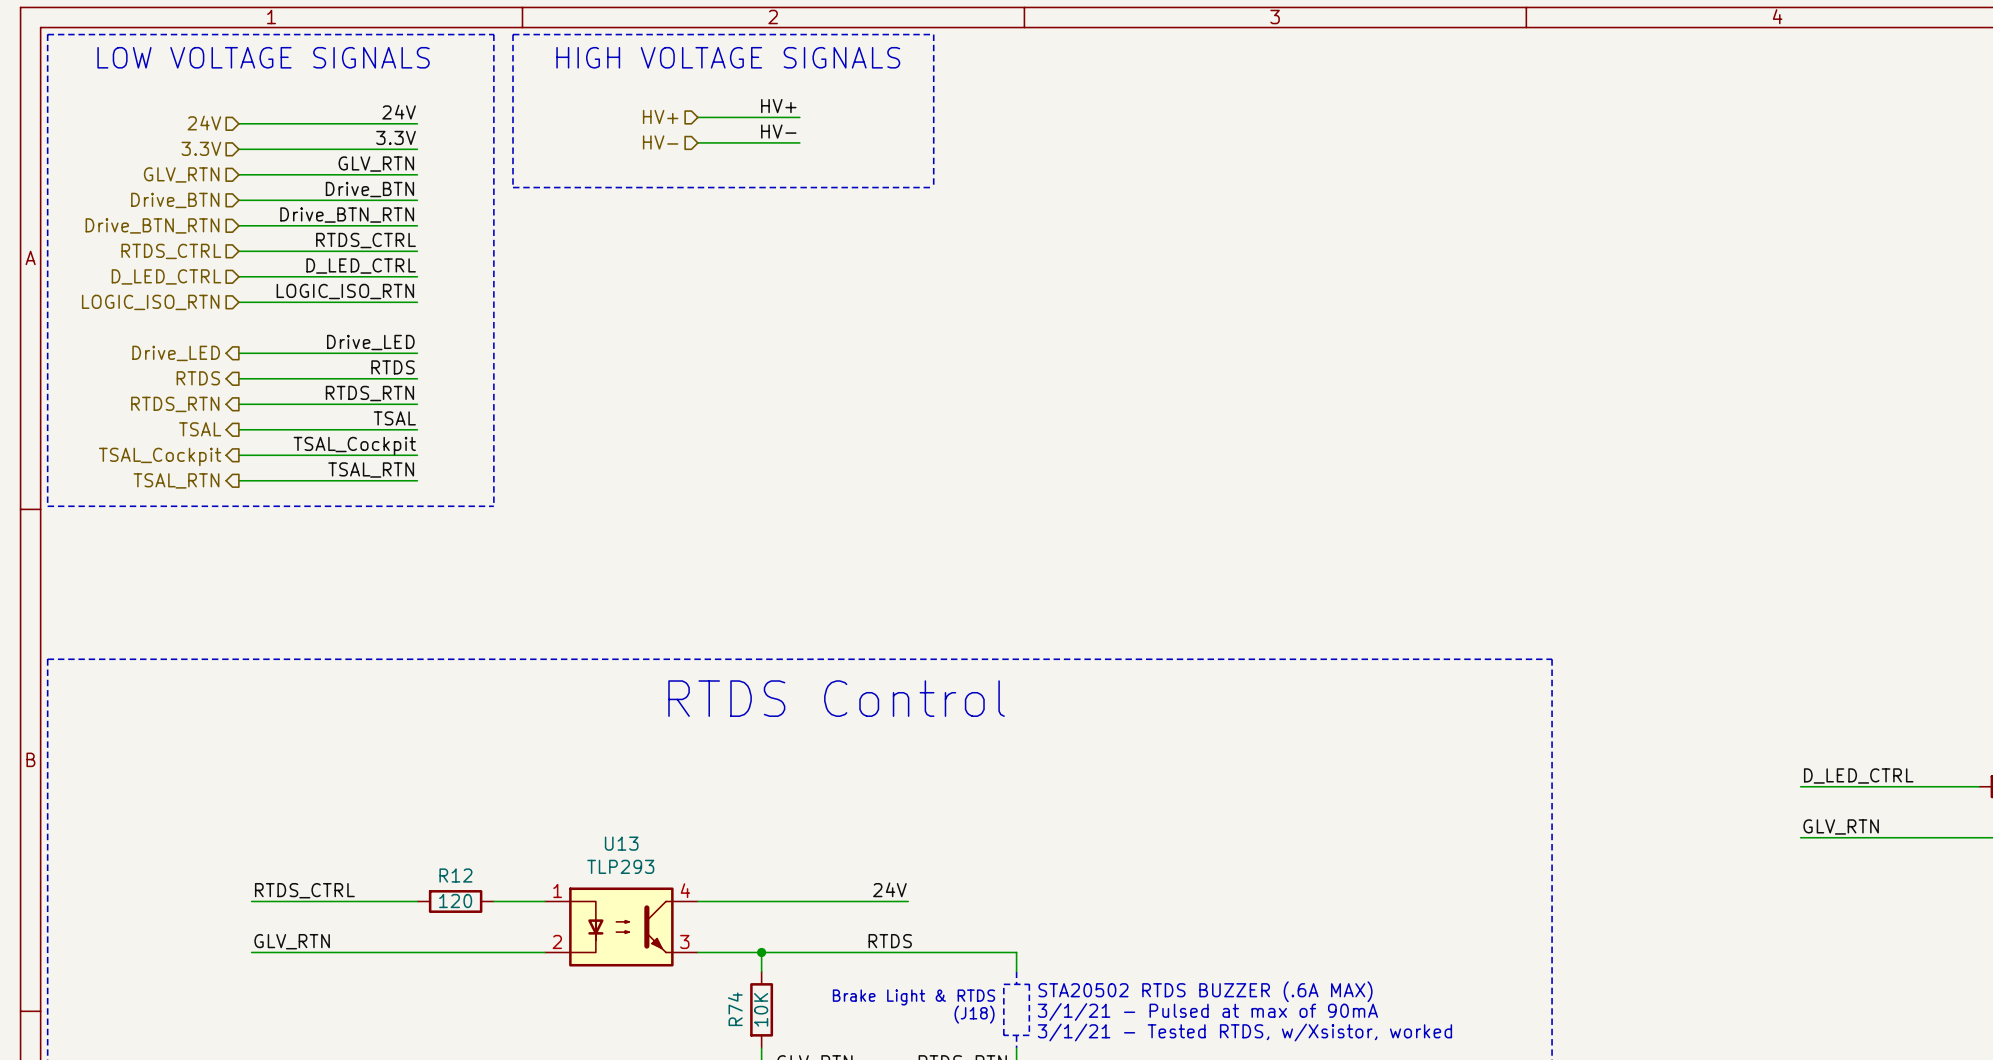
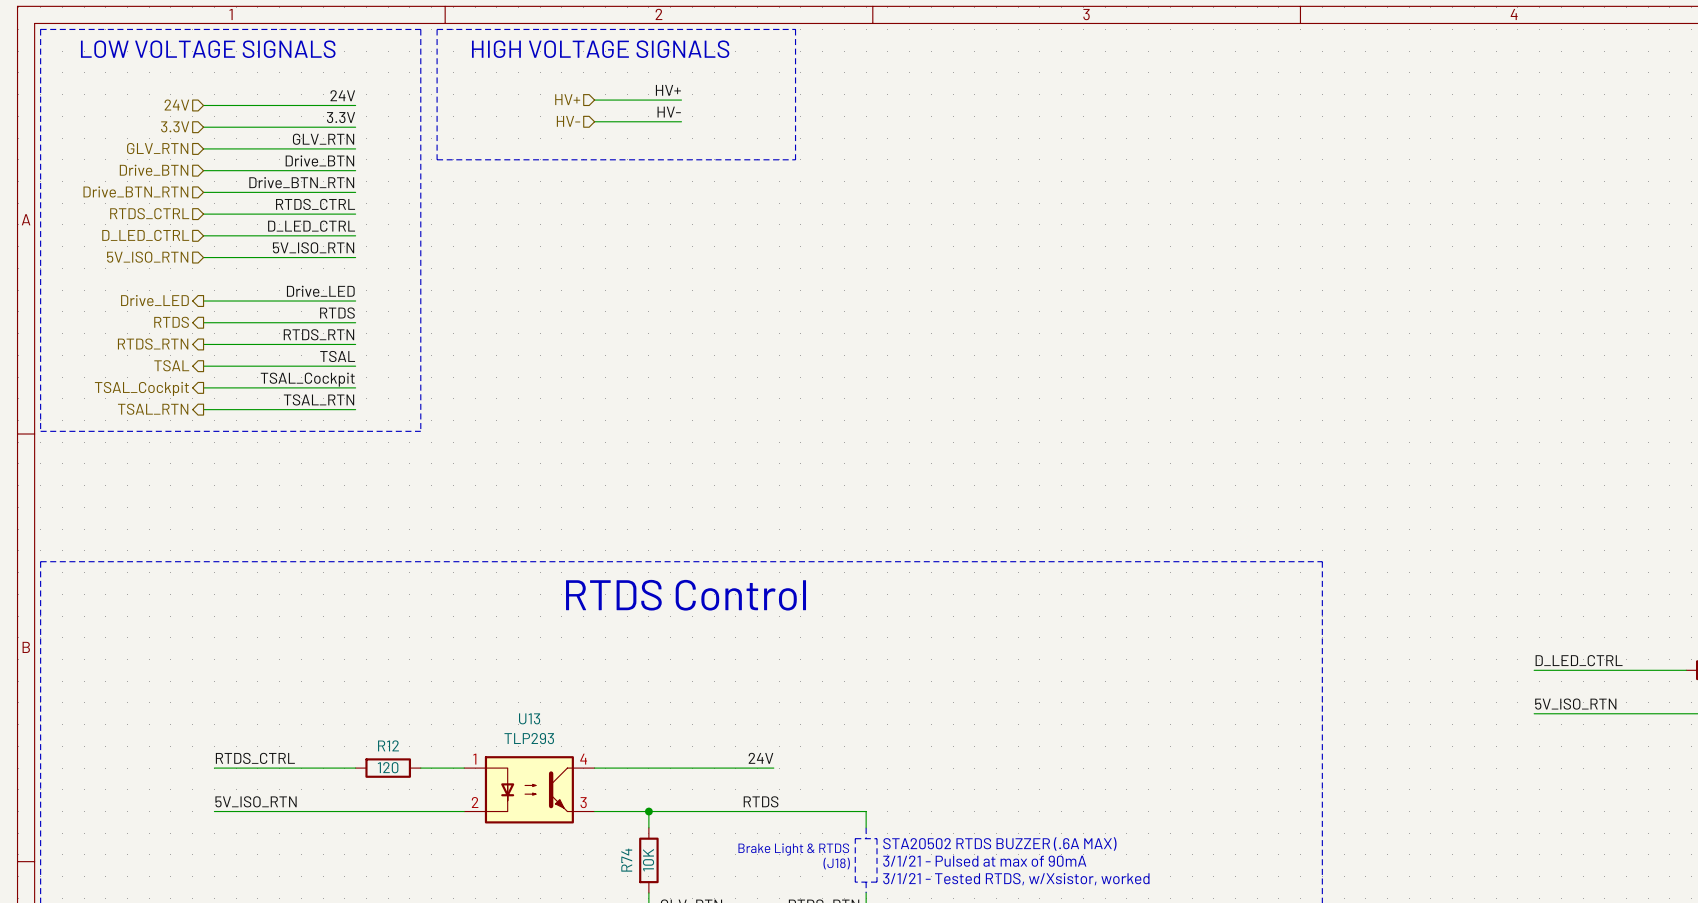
label: LOGIC_ISO_RTN (345, 291) -> 5V_ISO_RTN (313, 247)
hierarchical label: LOGIC_ISO_RTN (150, 302) -> 5V_ISO_RTN (147, 257)
label: GLV_RTN (1841, 826) -> 5V_ISO_RTN (1575, 704)
label: GLV_RTN (292, 941) -> 5V_ISO_RTN (256, 801)

